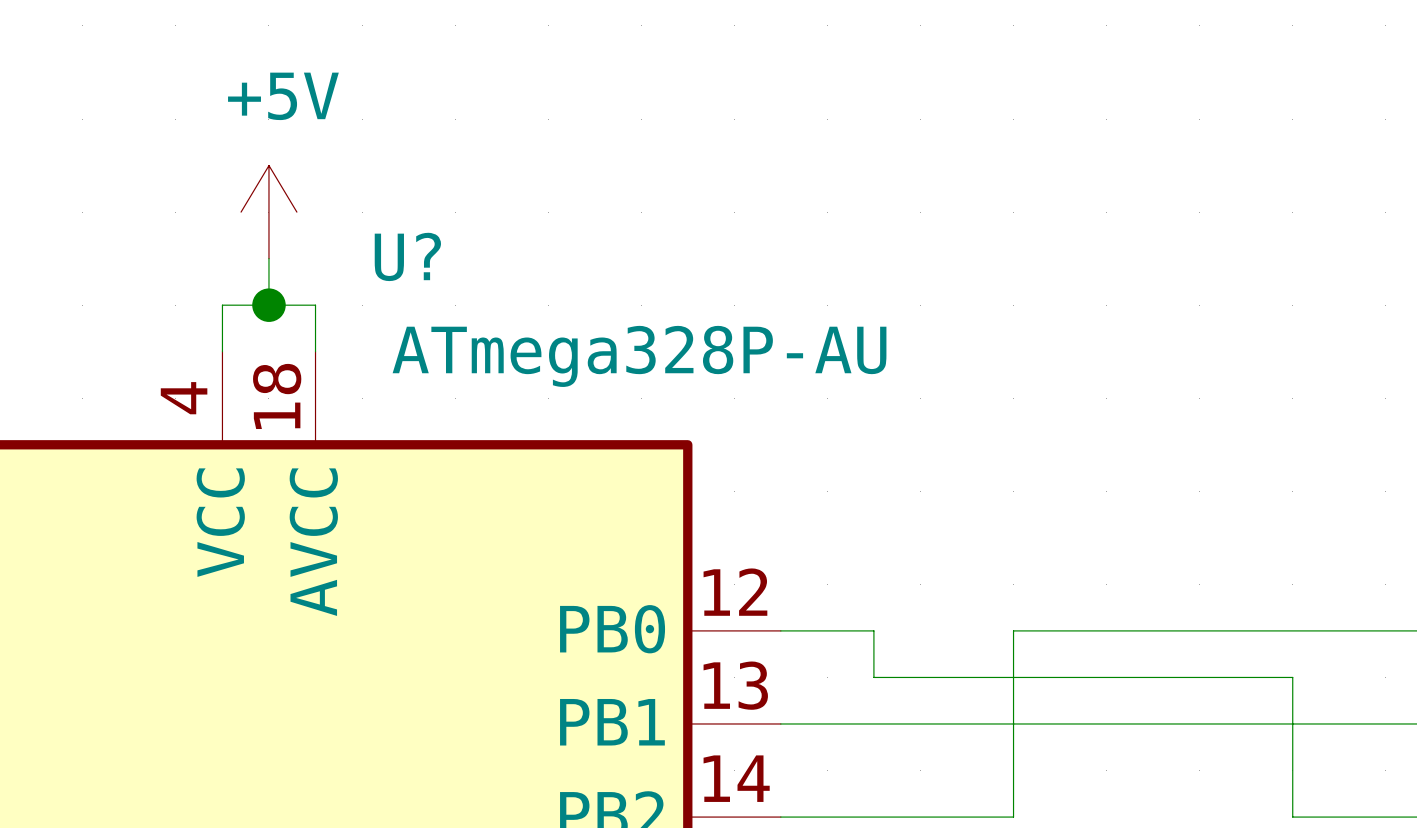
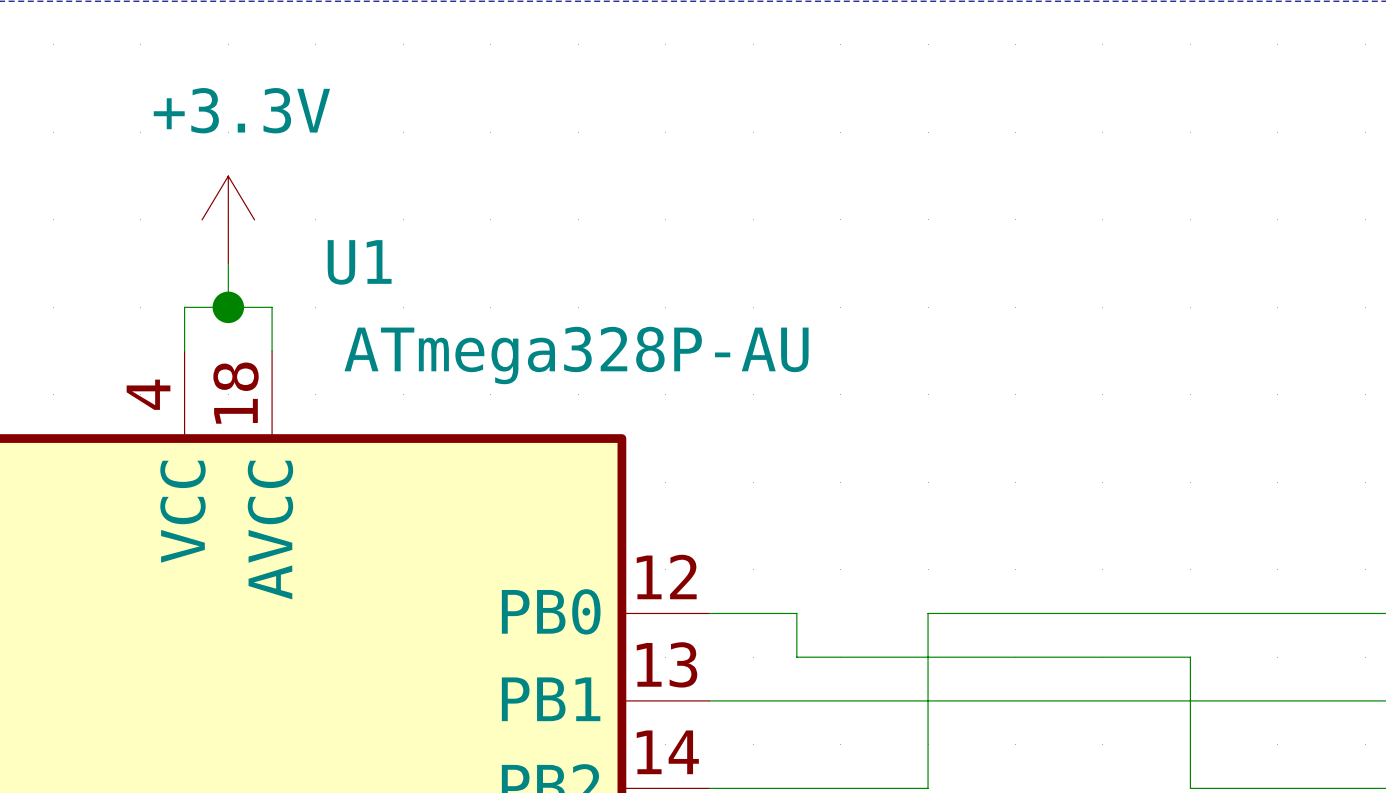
power symbol: +5V (268, 212) -> +3.3V (228, 219)
U? name: U? (407, 256) -> U1 (359, 262)

